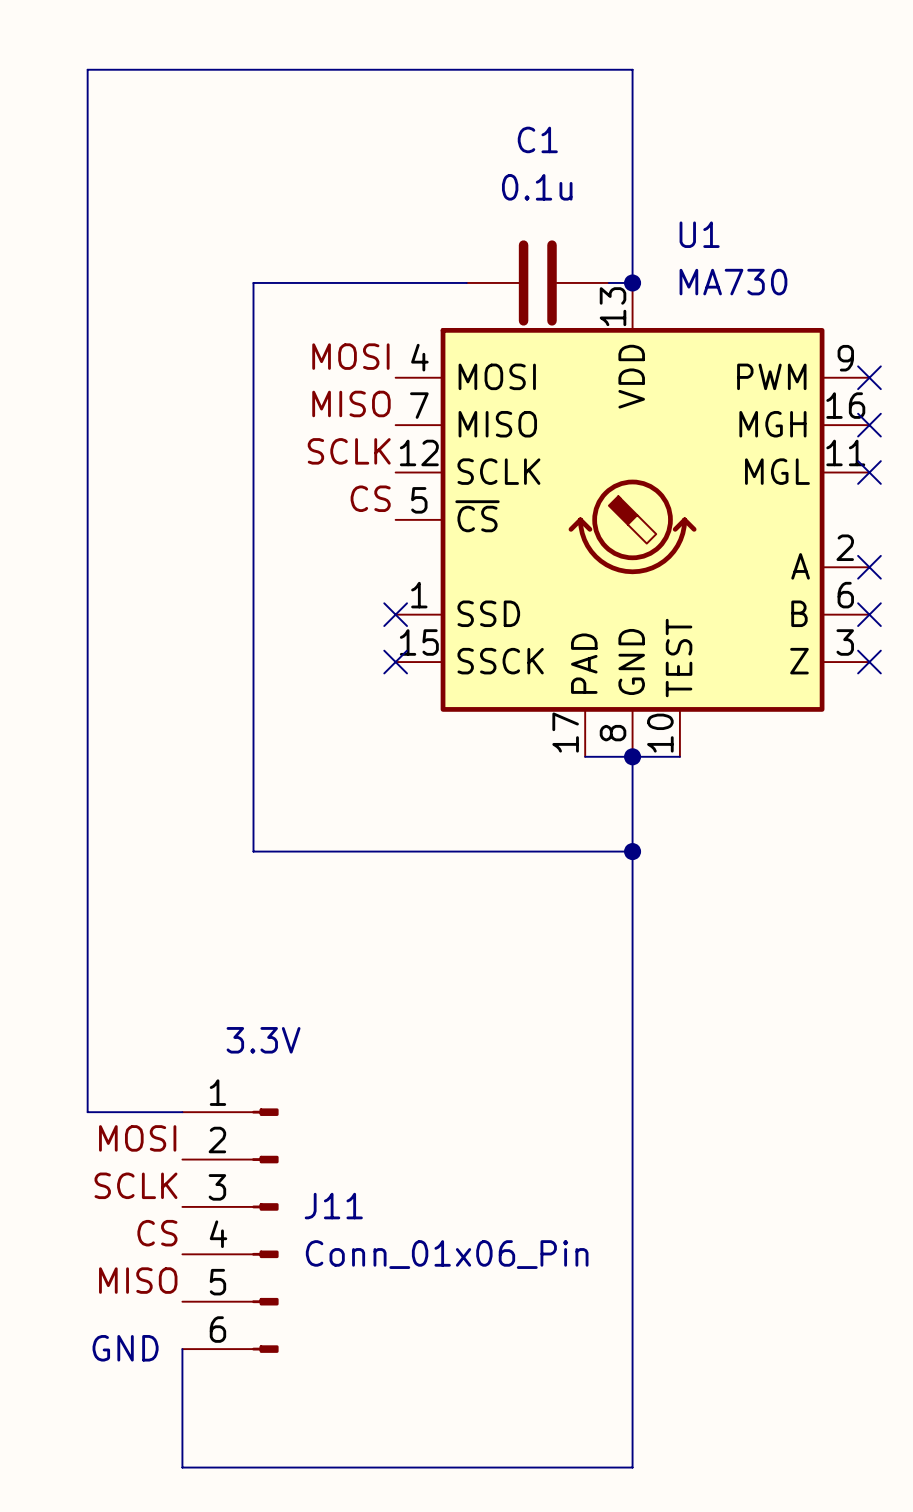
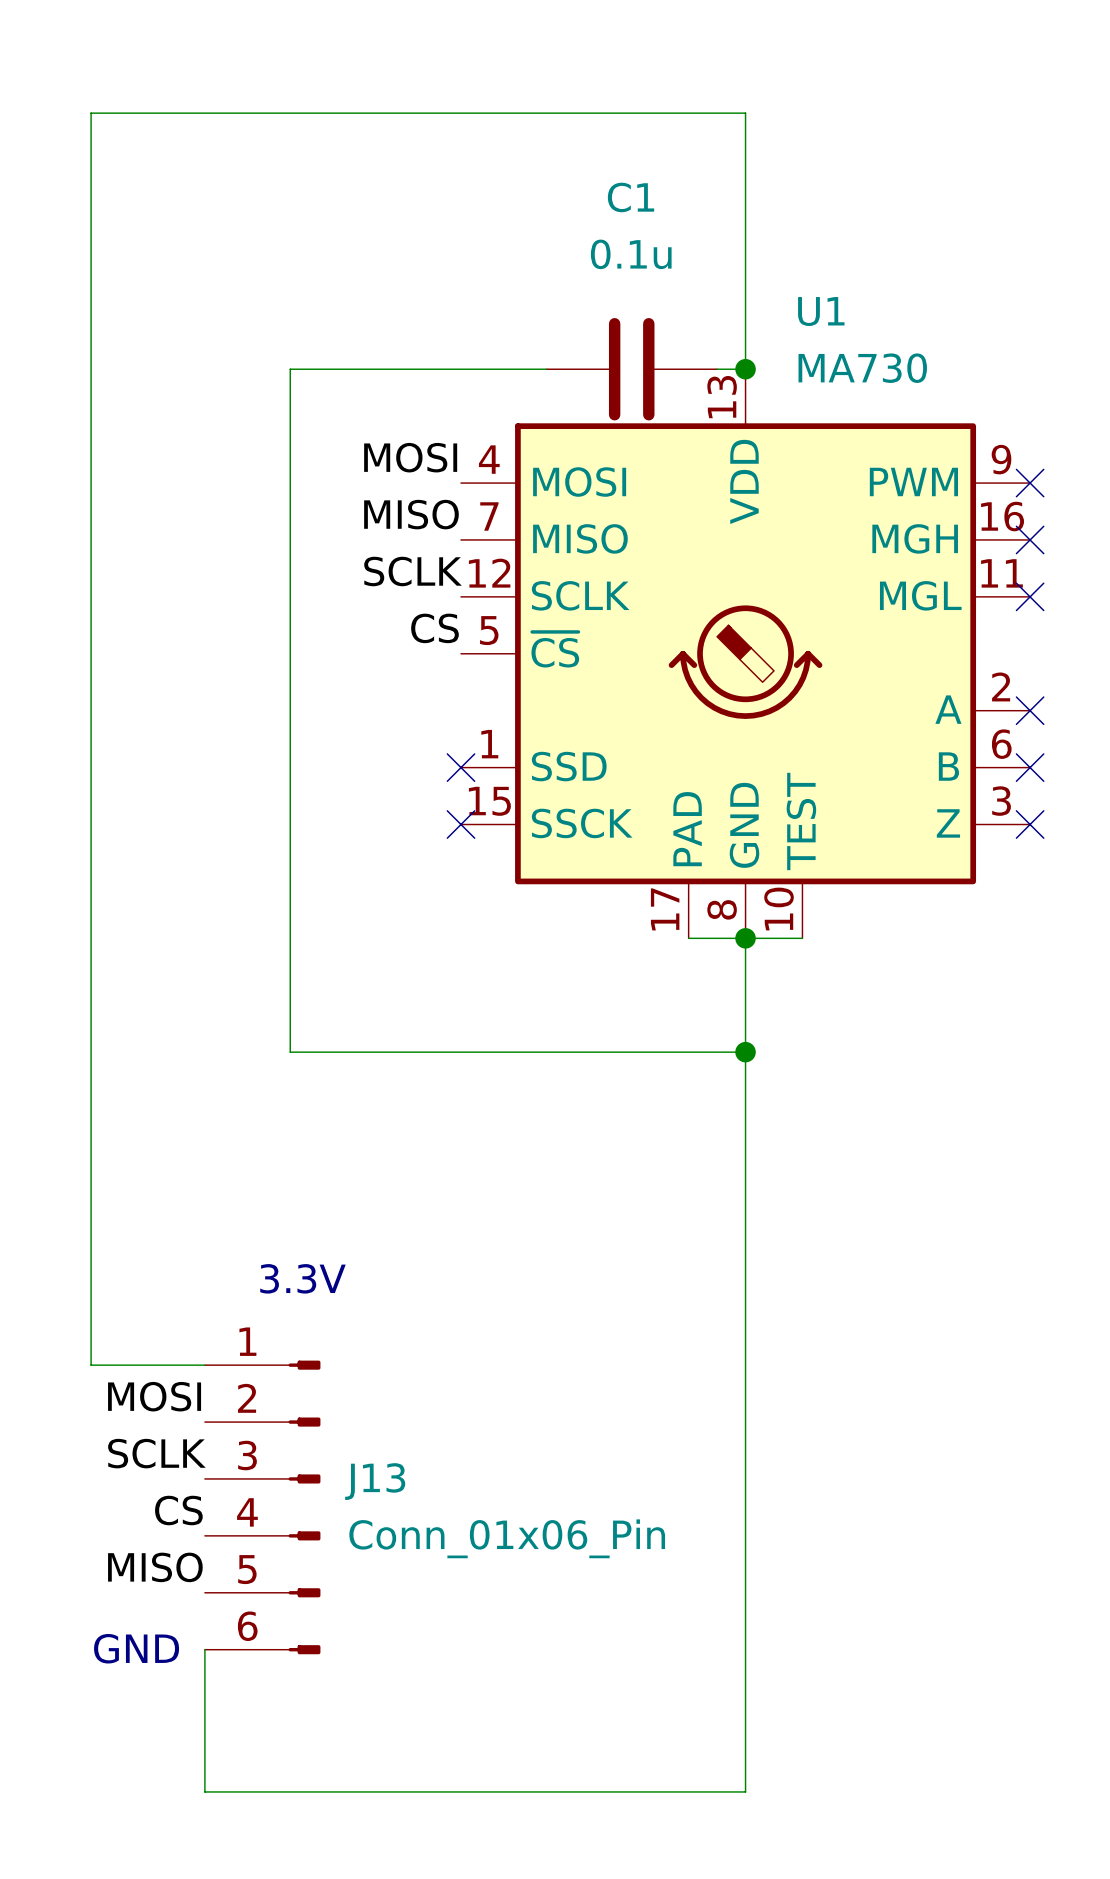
J11 name: J11 (333, 1206) -> J13 (375, 1481)

